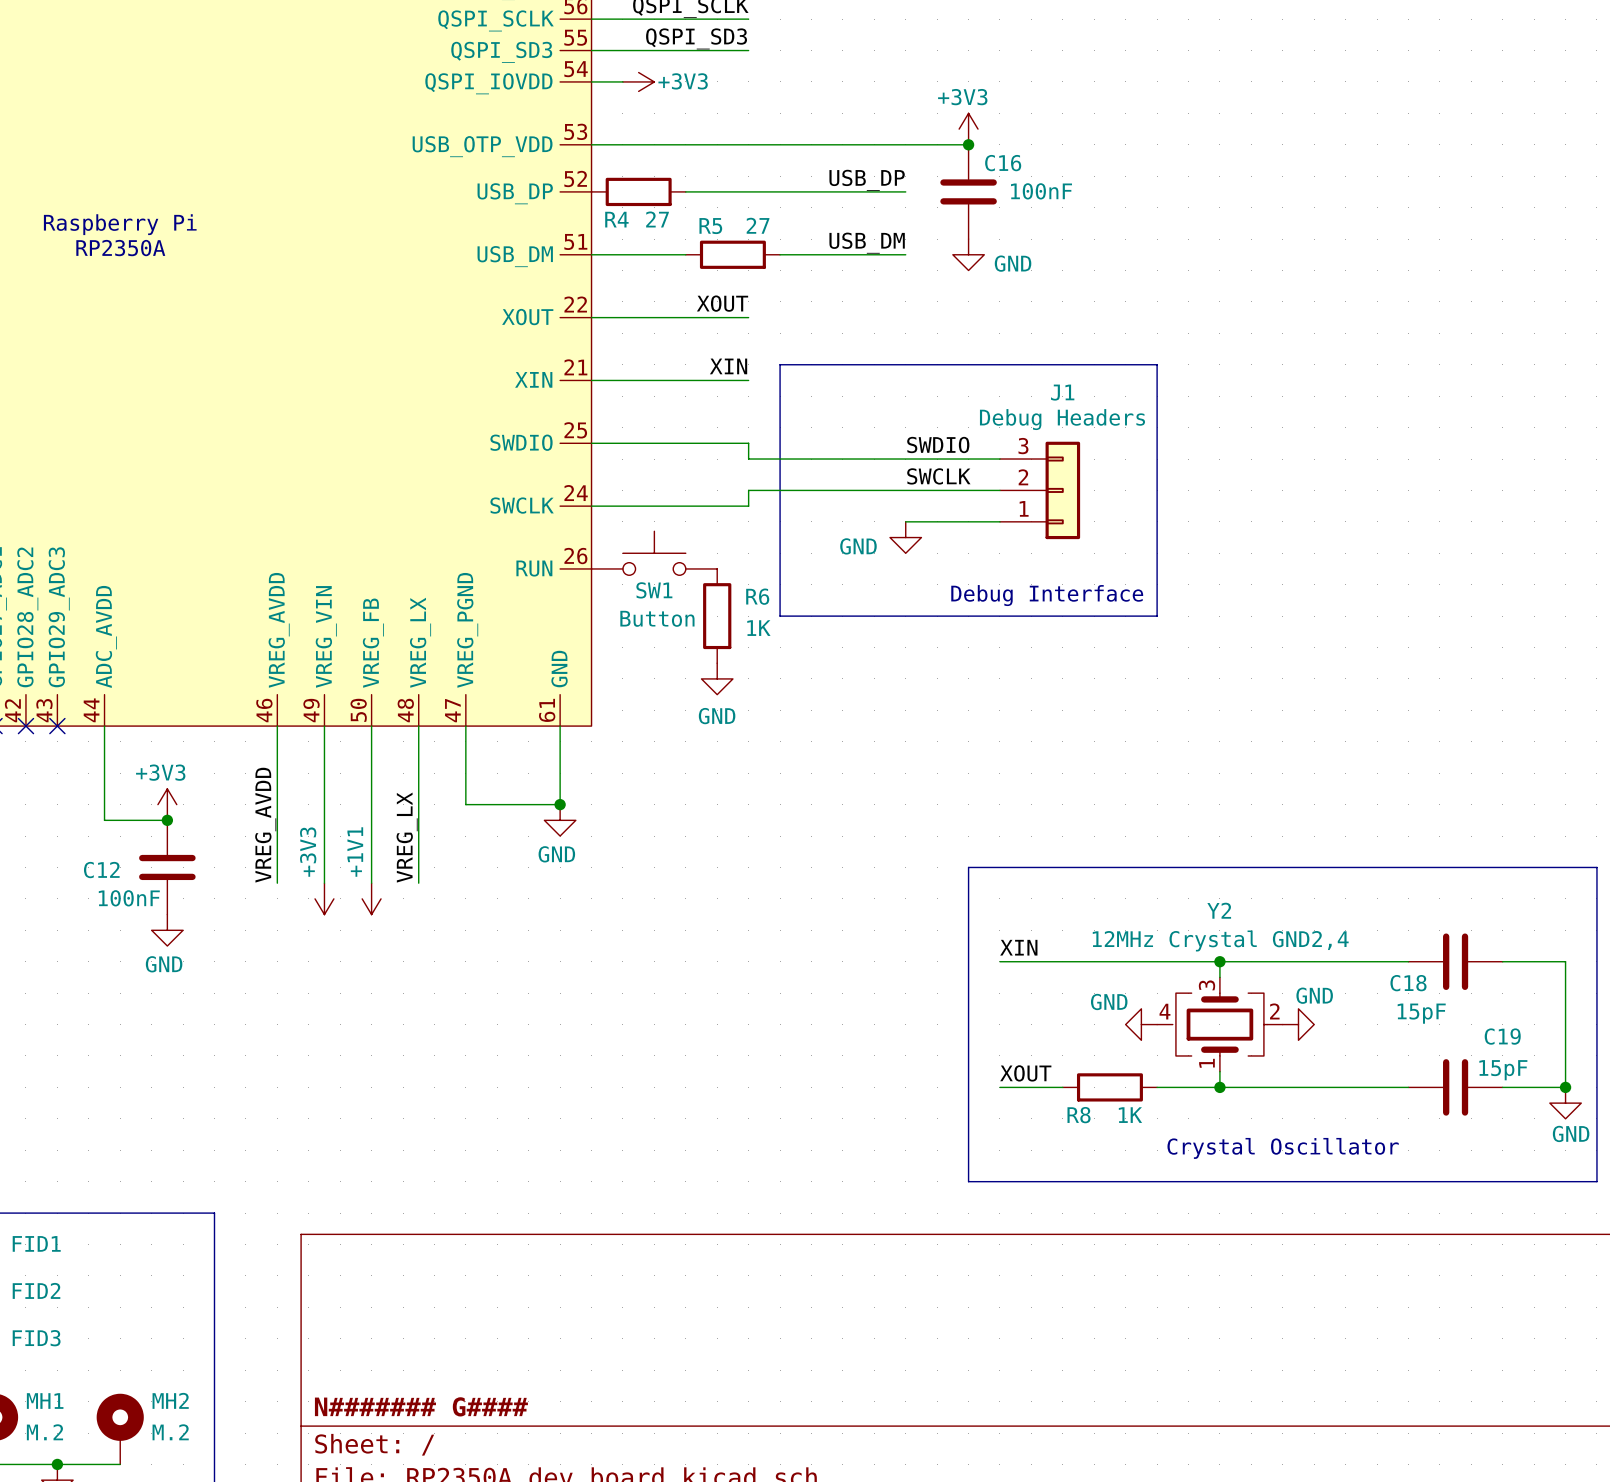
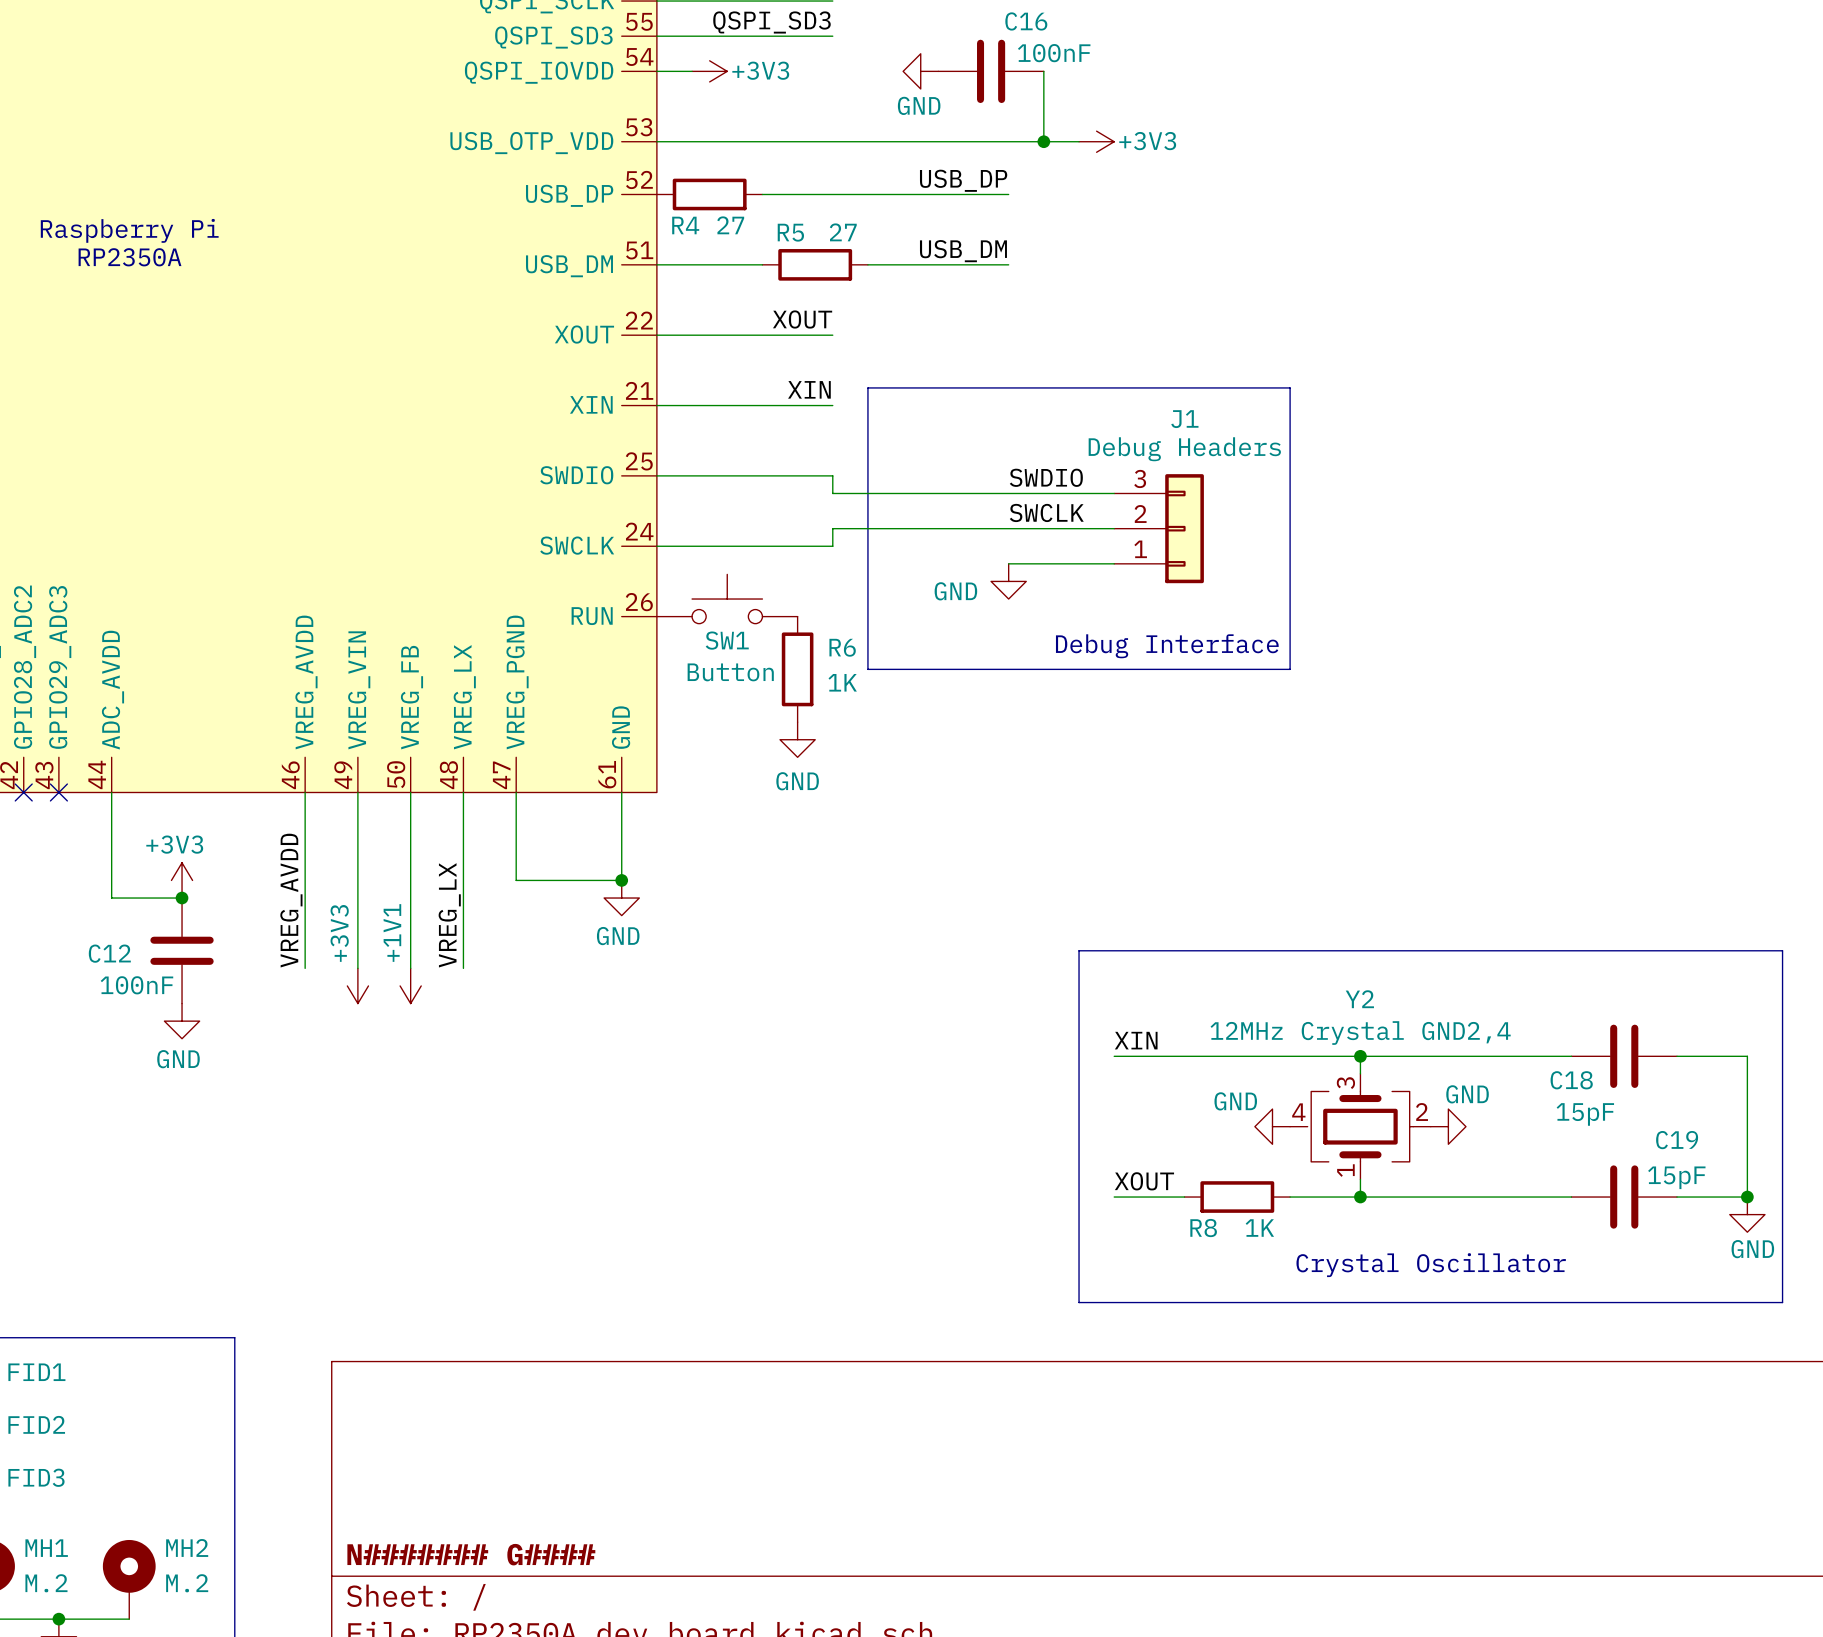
wire: none -> (1043, 71) (1043, 141)
power symbol text position: +3V3 (962, 97) -> +3V3 (1147, 141)
power symbol rotation: 0° (968, 129) -> 90° clockwise (1096, 141)
power symbol position: +3V3 (968, 129) -> +3V3 (1096, 141)
junction position: (968, 144) -> (1043, 141)
C16 rotation: 0° (968, 191) -> 90° clockwise (991, 71)
C16 position: (968, 191) -> (991, 71)
power symbol rotation: 0° (968, 254) -> 90° clockwise (920, 71)
power symbol position: GND (968, 254) -> GND (920, 71)

